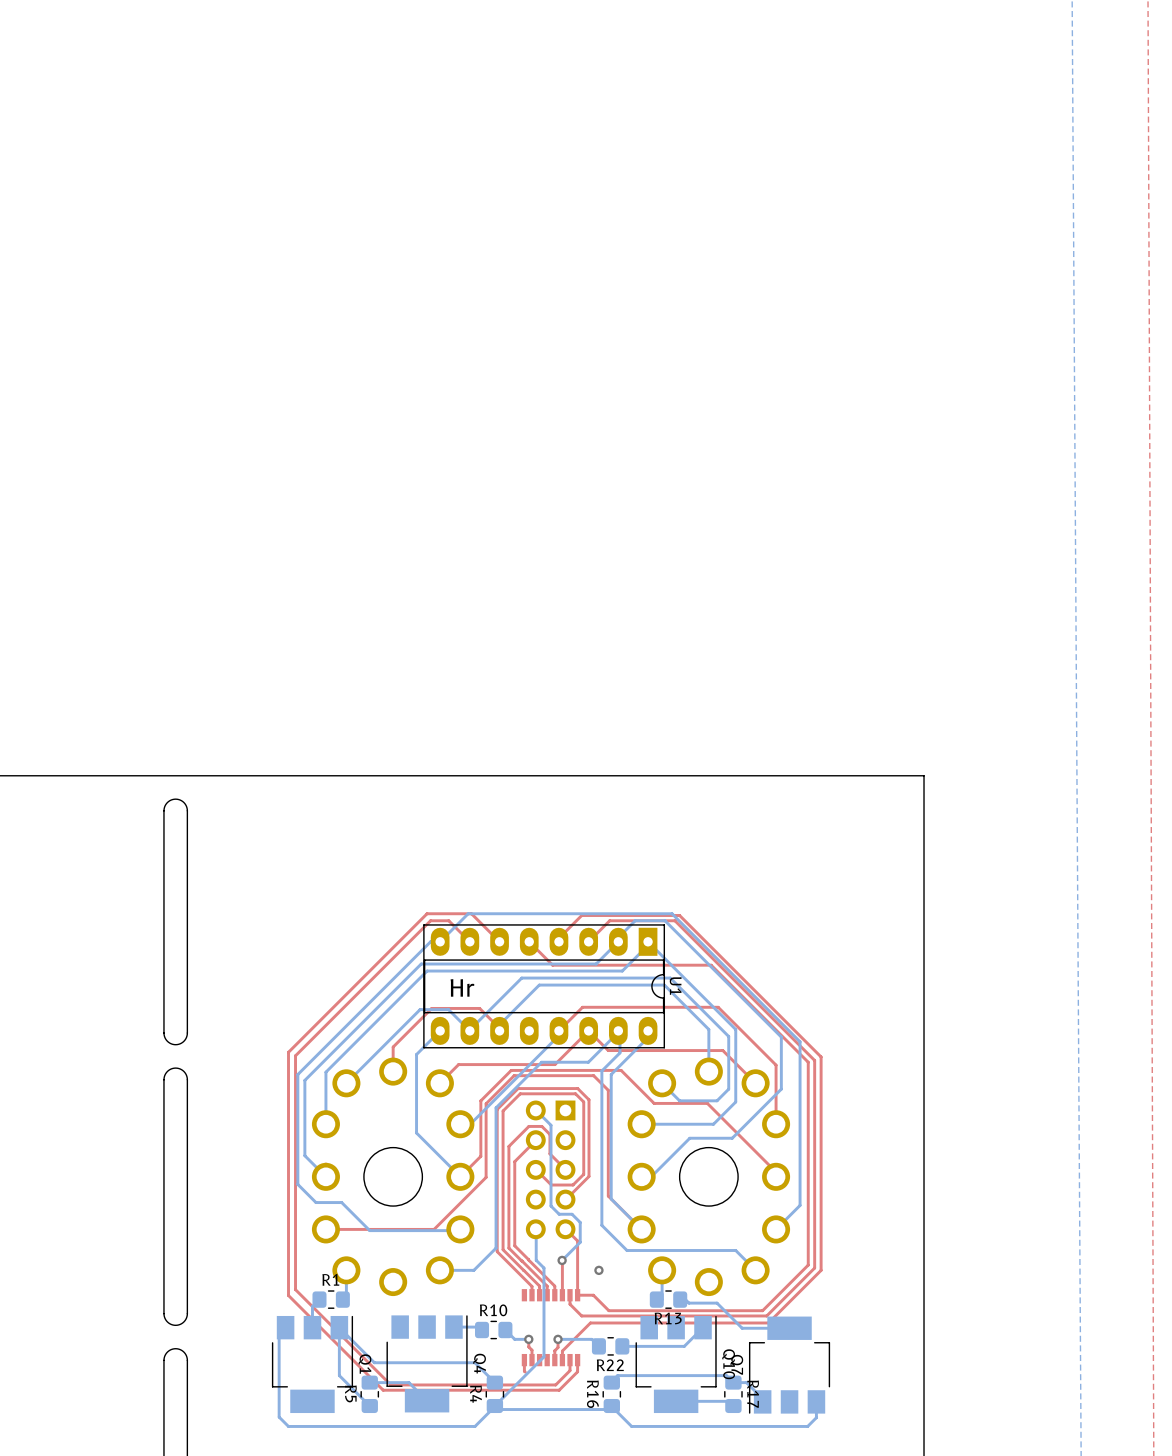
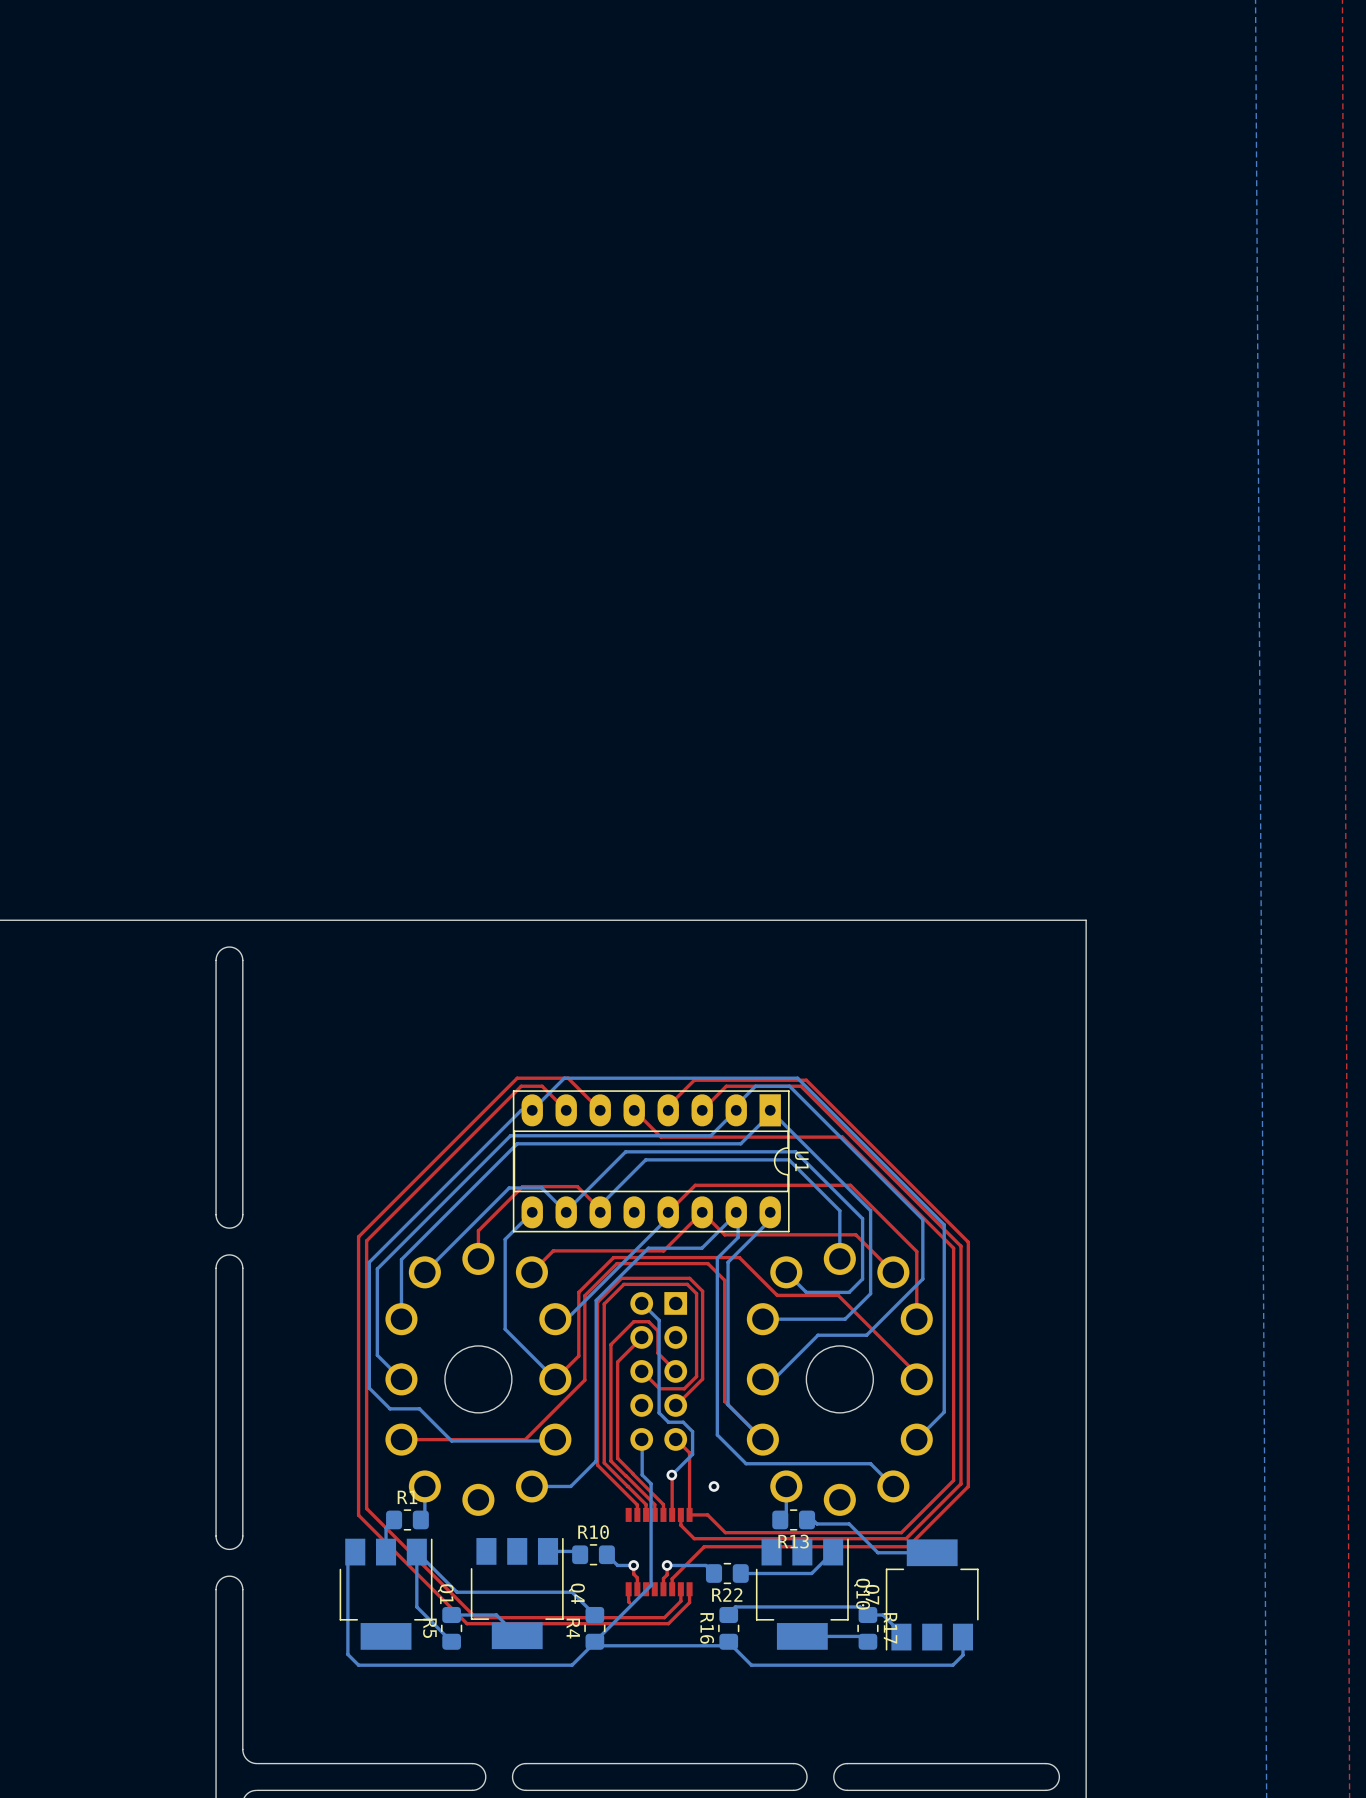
text: Hr (462, 987) -> none

